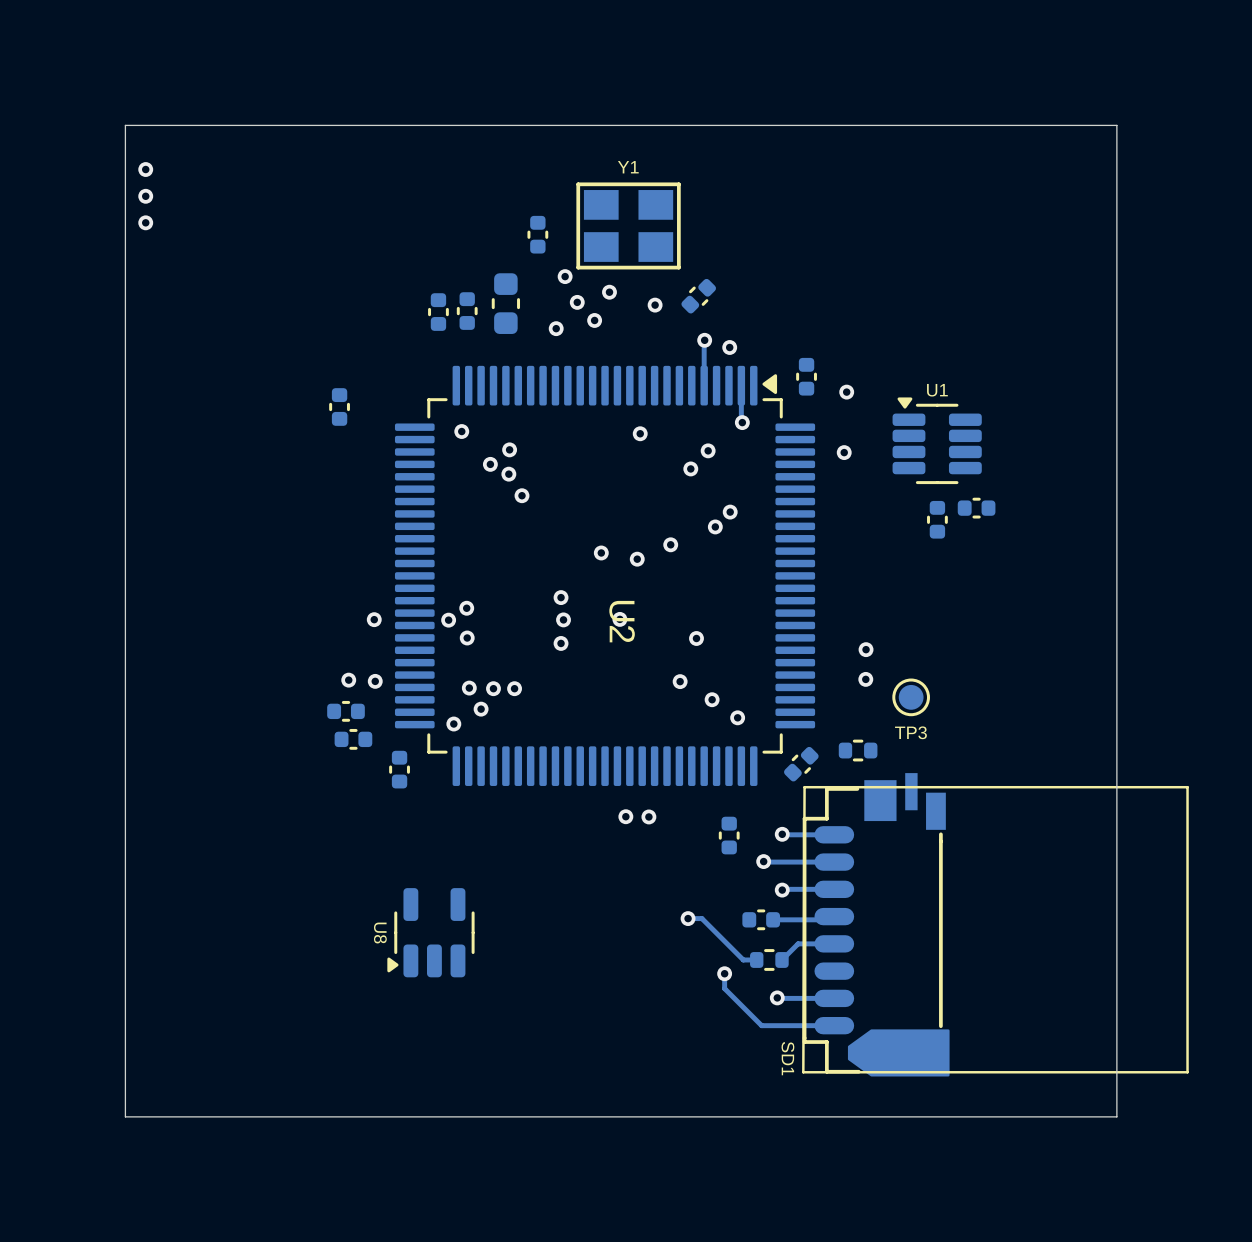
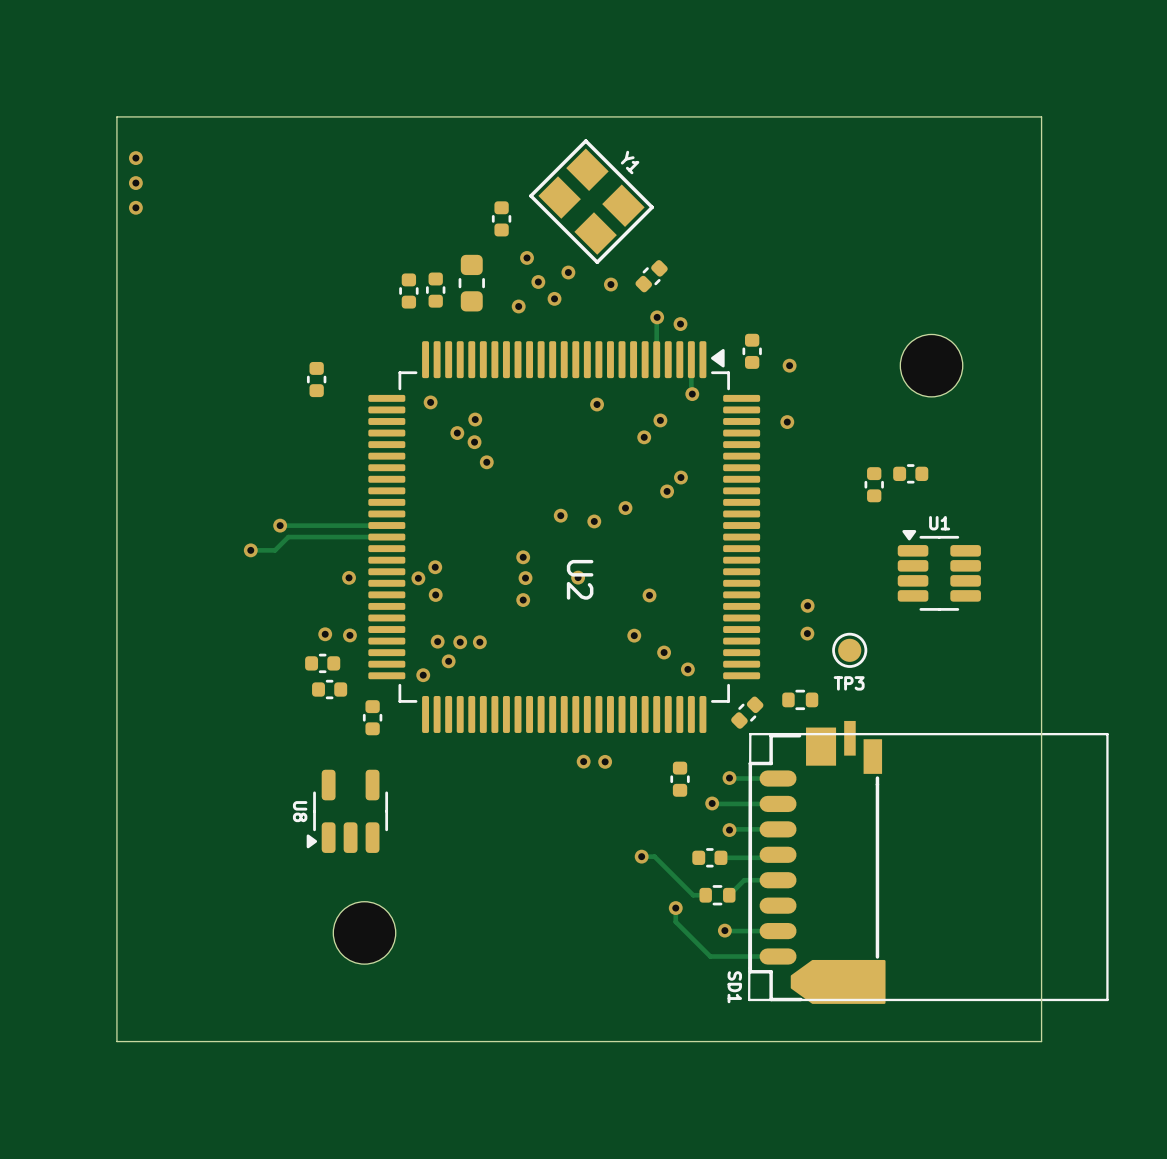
Y1 rotation: 0° (628, 225) -> 45° clockwise (591, 201)
part: none -> (931, 365)
U1 position: (937, 440) -> (939, 570)
via: none -> (280, 525)
track: none -> (386, 525) (280, 525)
track: none -> (386, 537) (288, 537) (275, 550) (250, 550)
via: none -> (250, 550)
U8 position: (430, 932) -> (347, 811)
part: none -> (364, 932)

